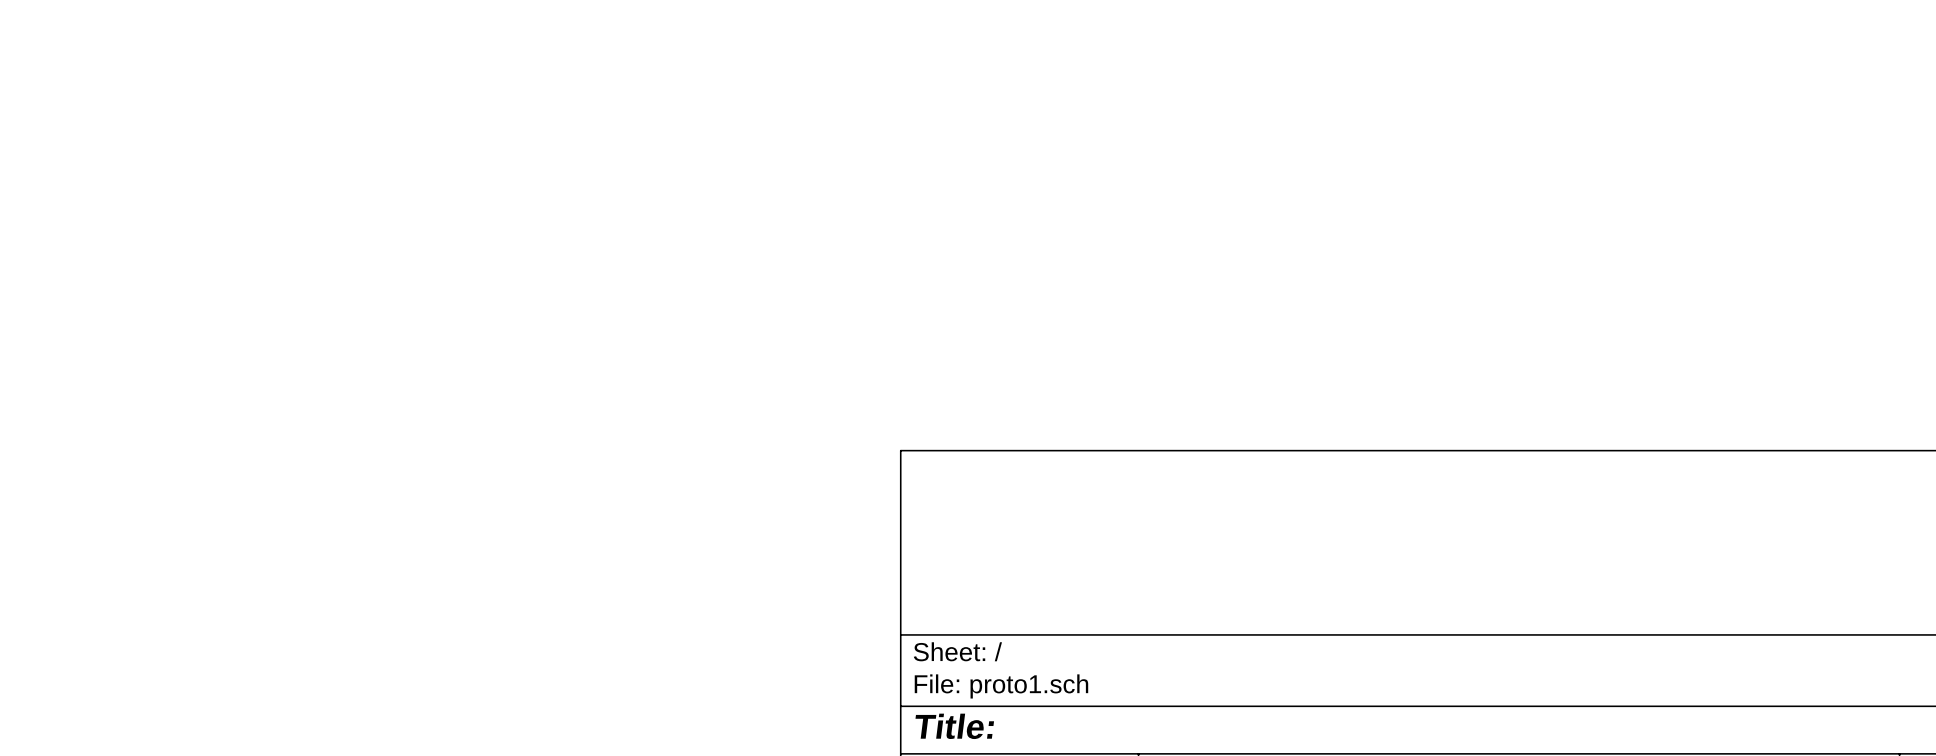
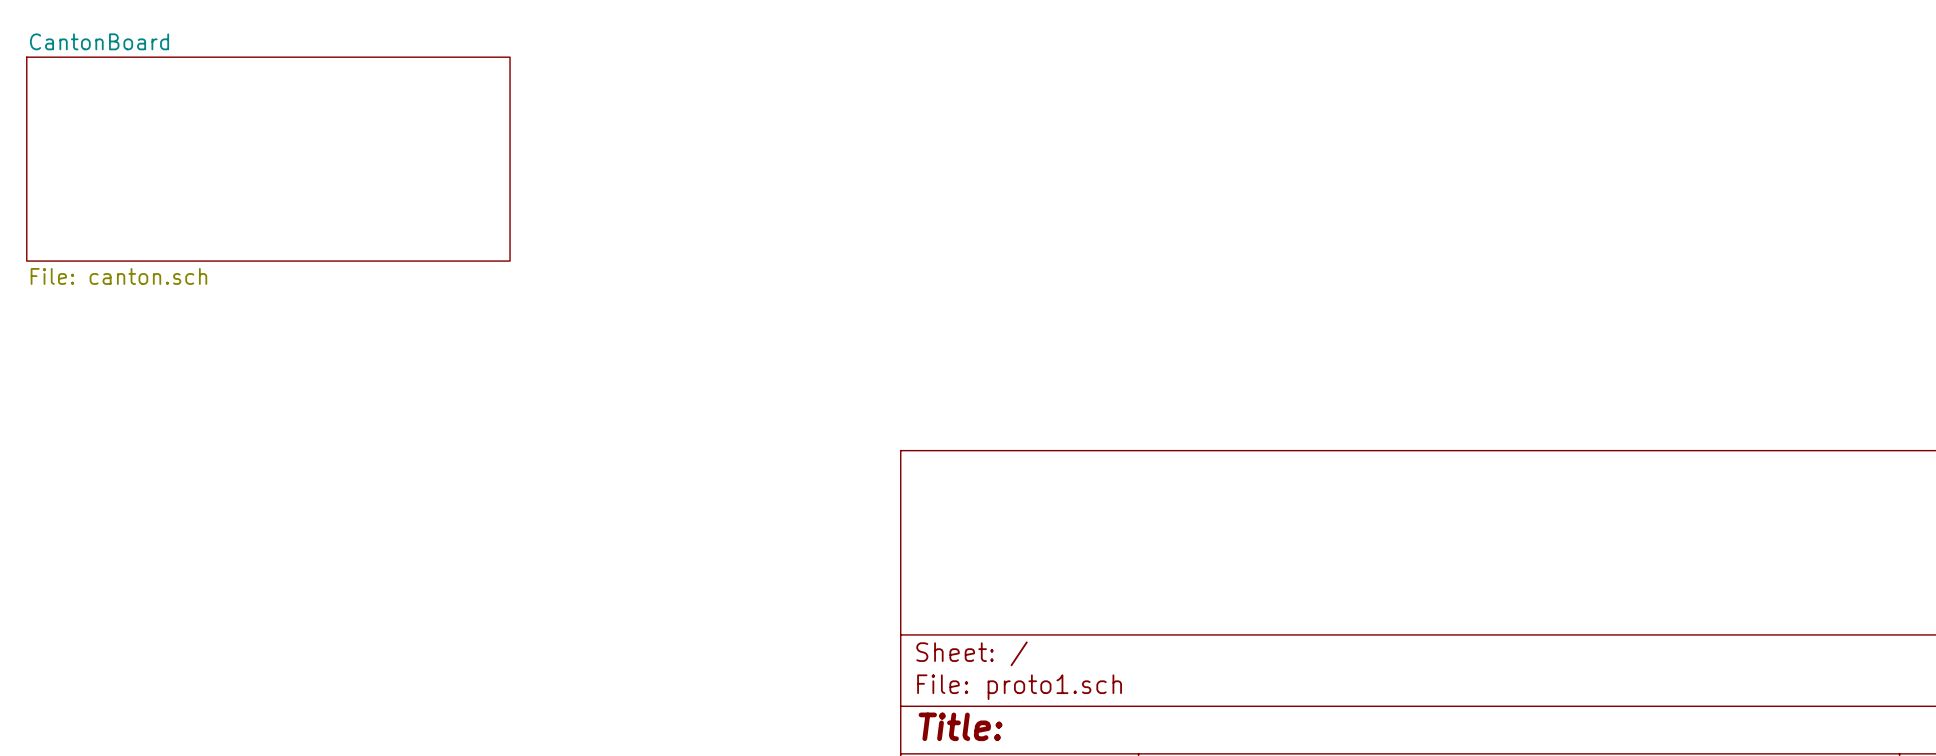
sheet CantonBoard: none -> File: canton.sch (268, 159)

